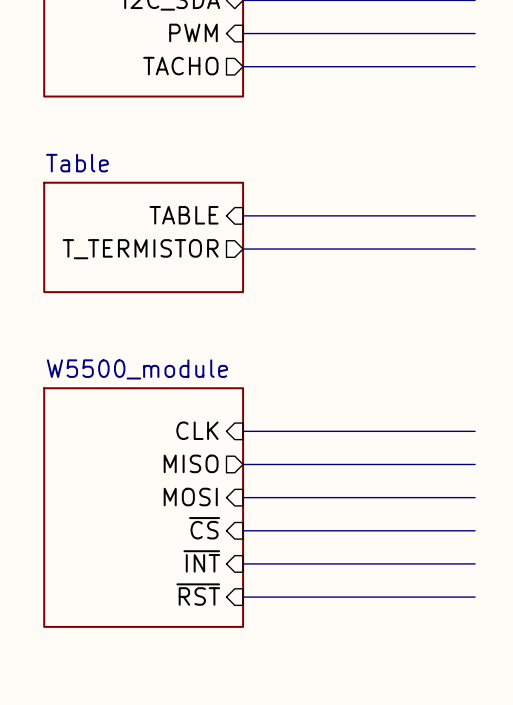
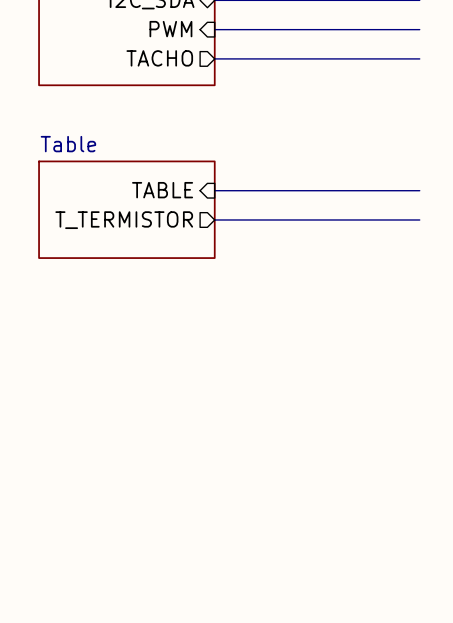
sheet pin: CLK (197, 430) -> none
wire: (243, 431) (475, 431) -> none
sheet pin: MISO (191, 463) -> none
wire: (243, 464) (475, 464) -> none
sheet pin: MOSI (190, 497) -> none
wire: (243, 497) (475, 497) -> none
sheet W5500_module: (143, 507) -> none
sheet pin: ~{CS} (204, 528) -> none
wire: (243, 530) (475, 530) -> none
sheet pin: ~{INT} (201, 561) -> none
wire: (243, 563) (475, 563) -> none
sheet pin: ~{RST} (198, 594) -> none
wire: (243, 597) (475, 597) -> none

